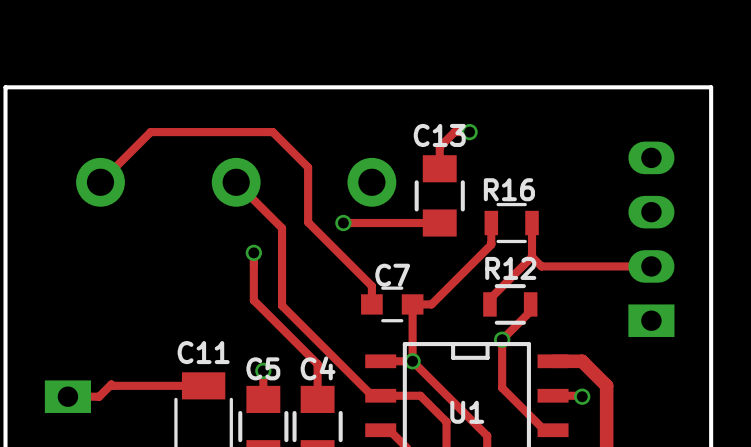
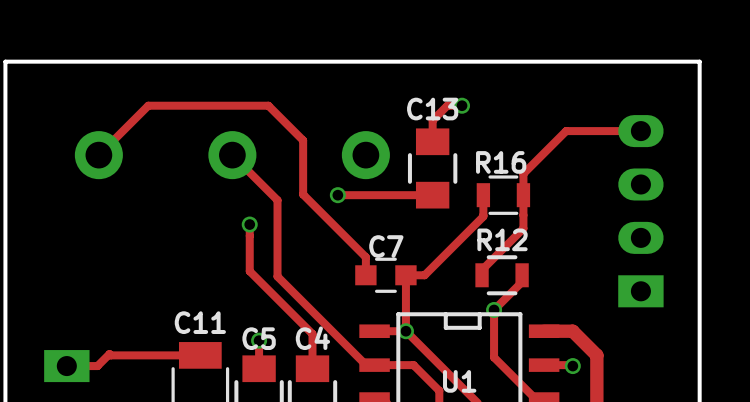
track: none -> (640, 131) (566, 131) (523, 173) (523, 195)
track: (532, 256) (541, 266) (651, 266) -> none

